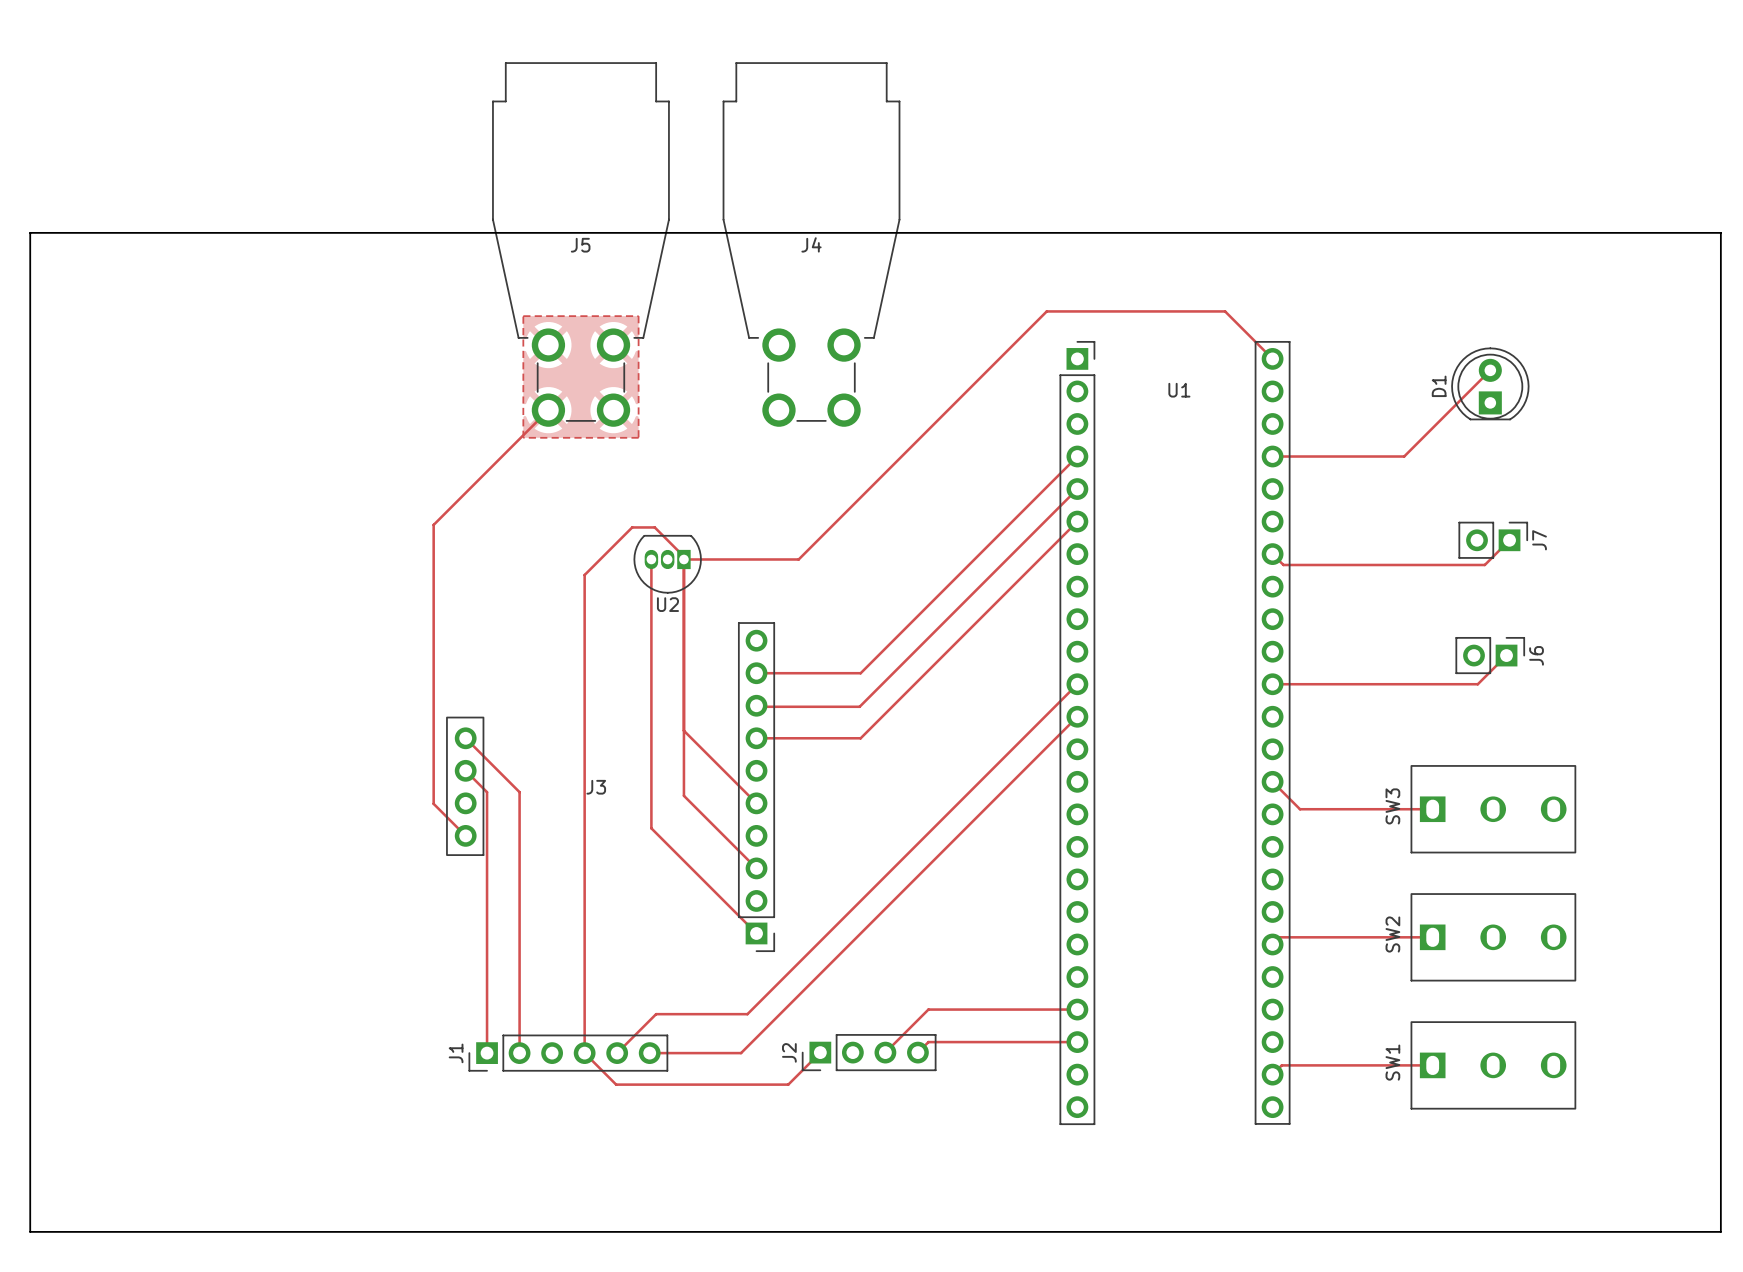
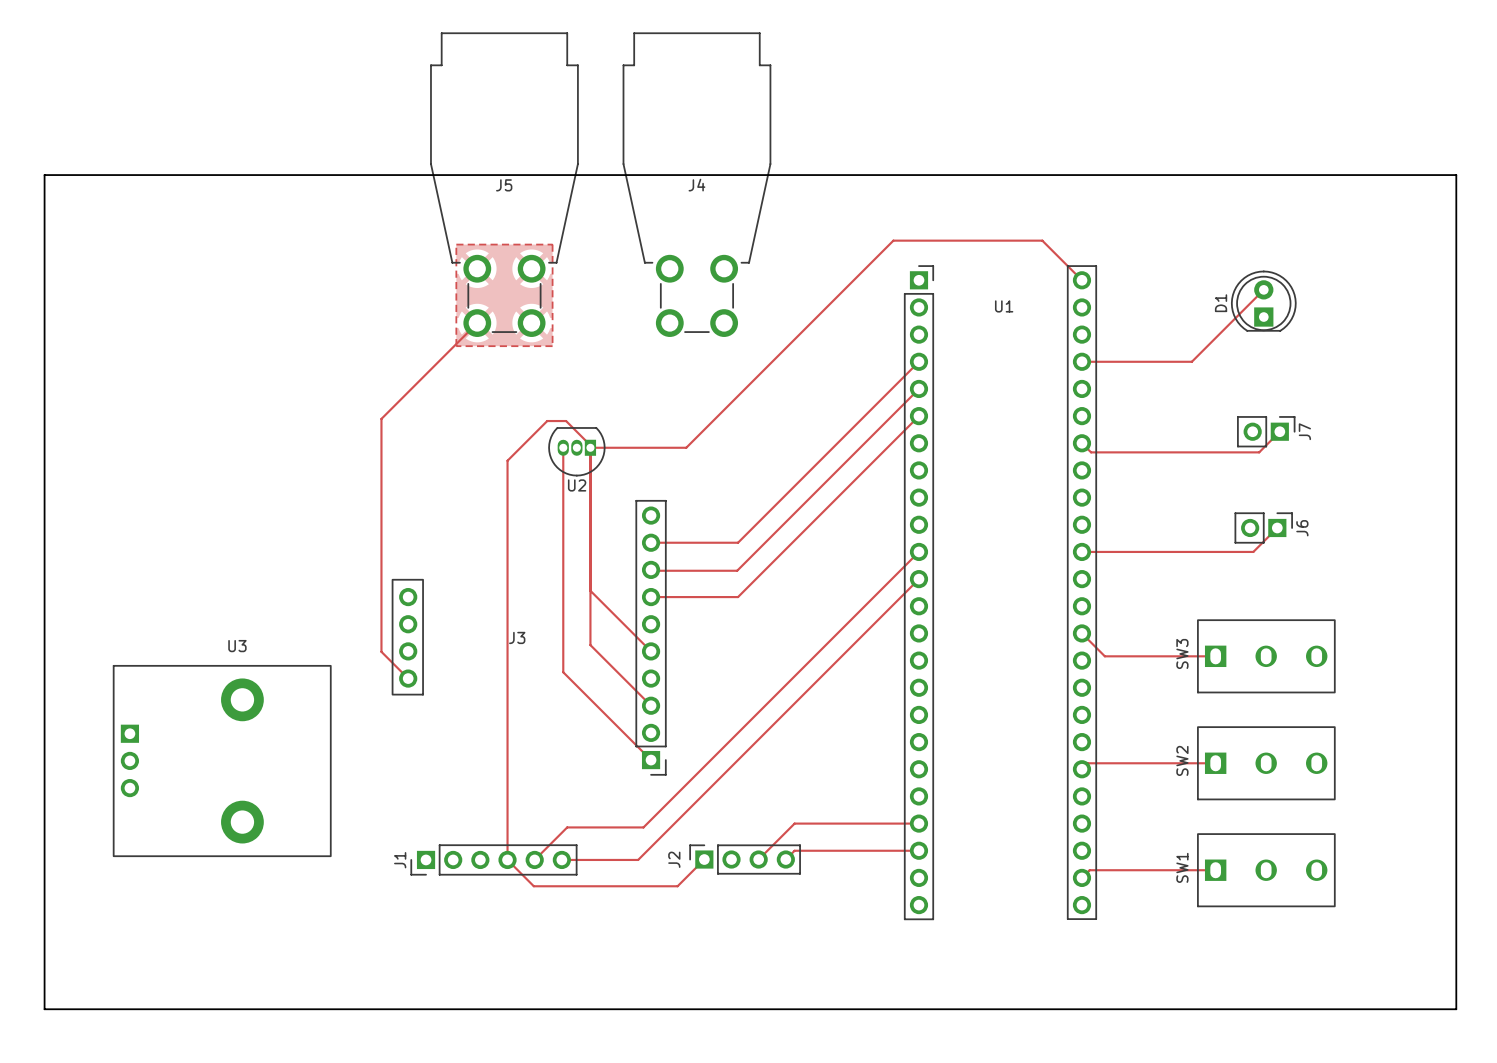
track: (465, 738) (519, 792) (519, 1053) -> none
track: (465, 770) (487, 792) (487, 1053) -> none
U3: none -> (222, 761)
J2 footprint: [801, 1034, 937, 1072] -> [689, 844, 801, 875]

